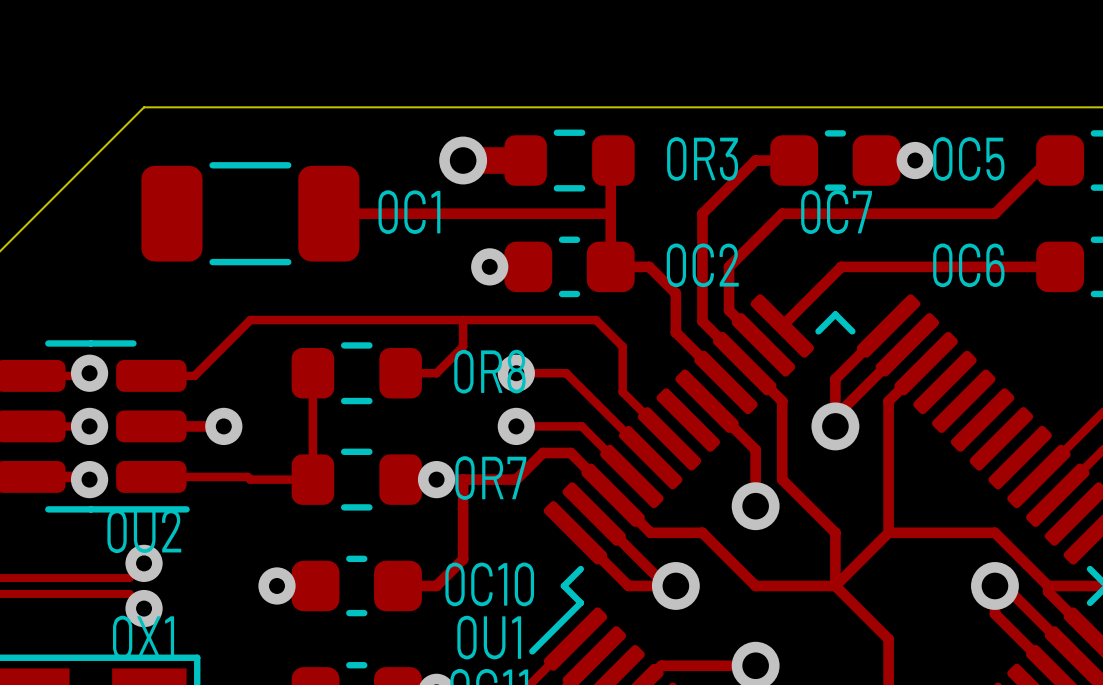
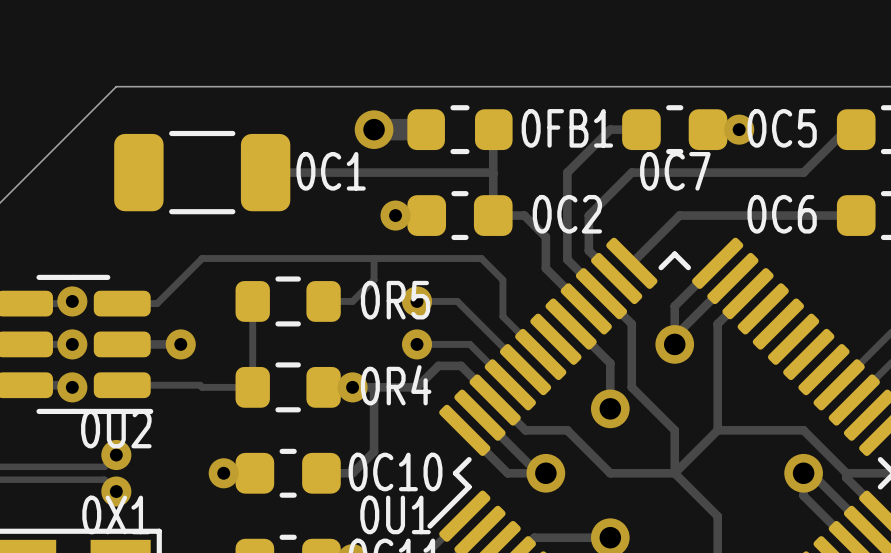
0R3: (569, 160) -> none
0FB1: none -> (459, 129)
0R8 name: 0R8 (489, 371) -> 0R5 (395, 300)
0R7 name: 0R7 (490, 478) -> 0R4 (396, 385)

